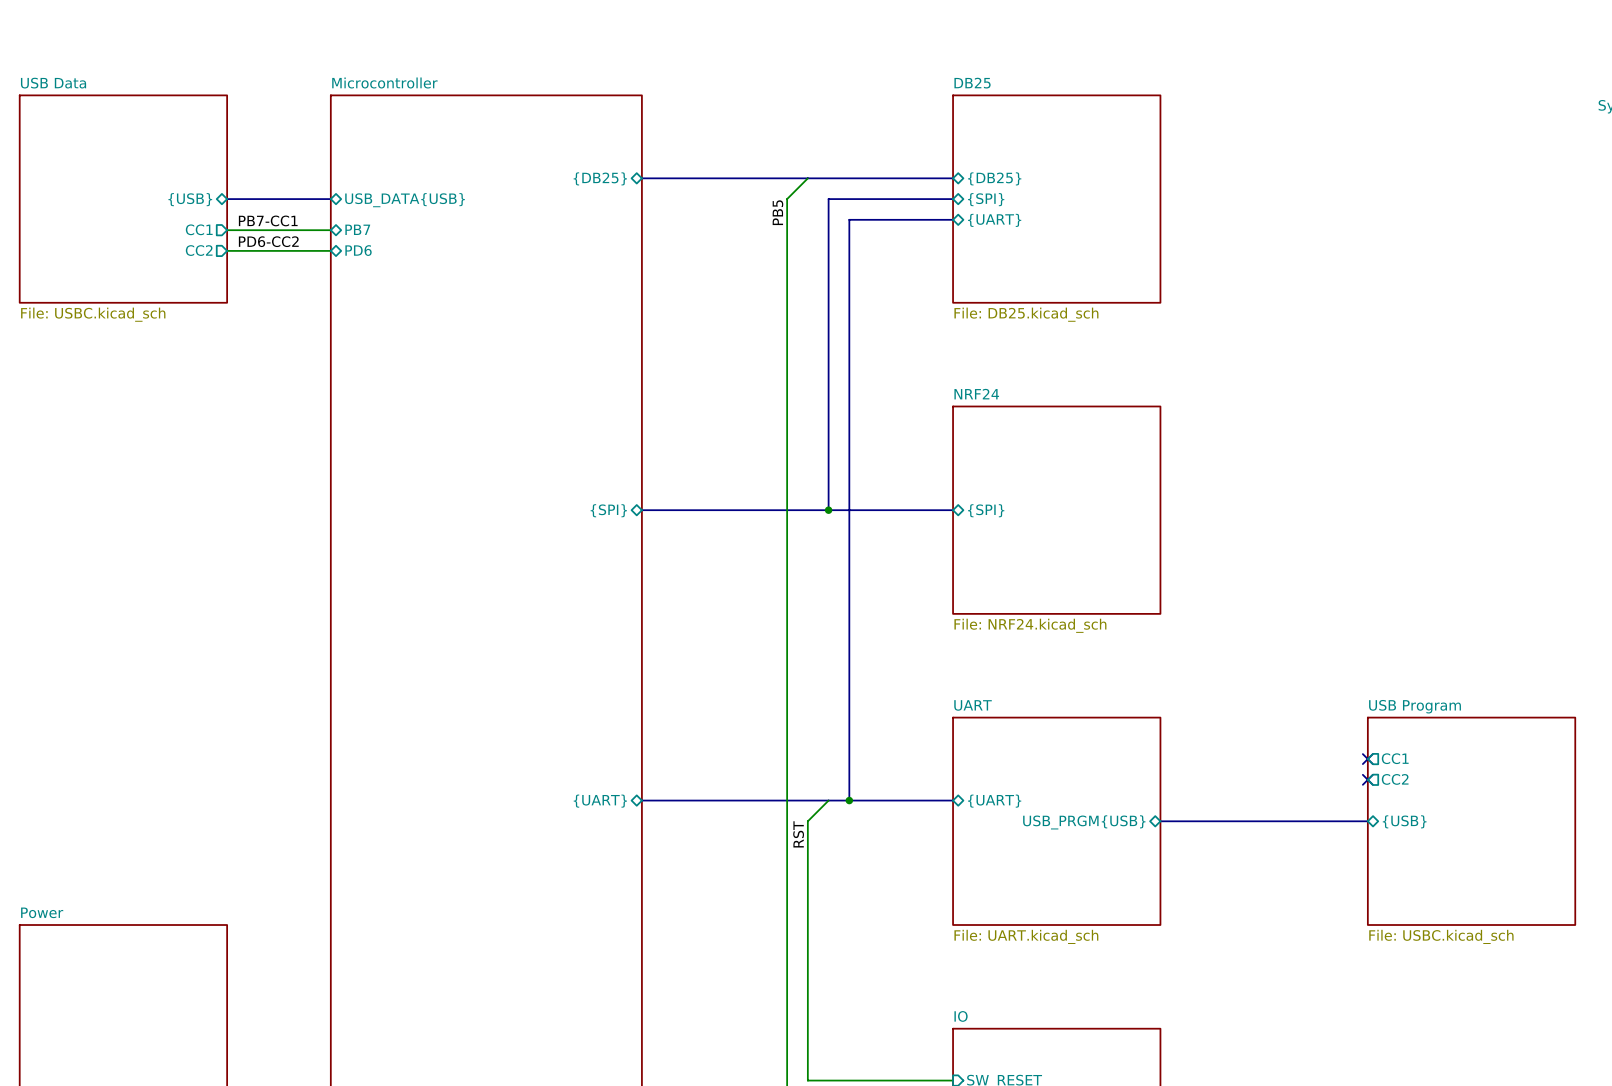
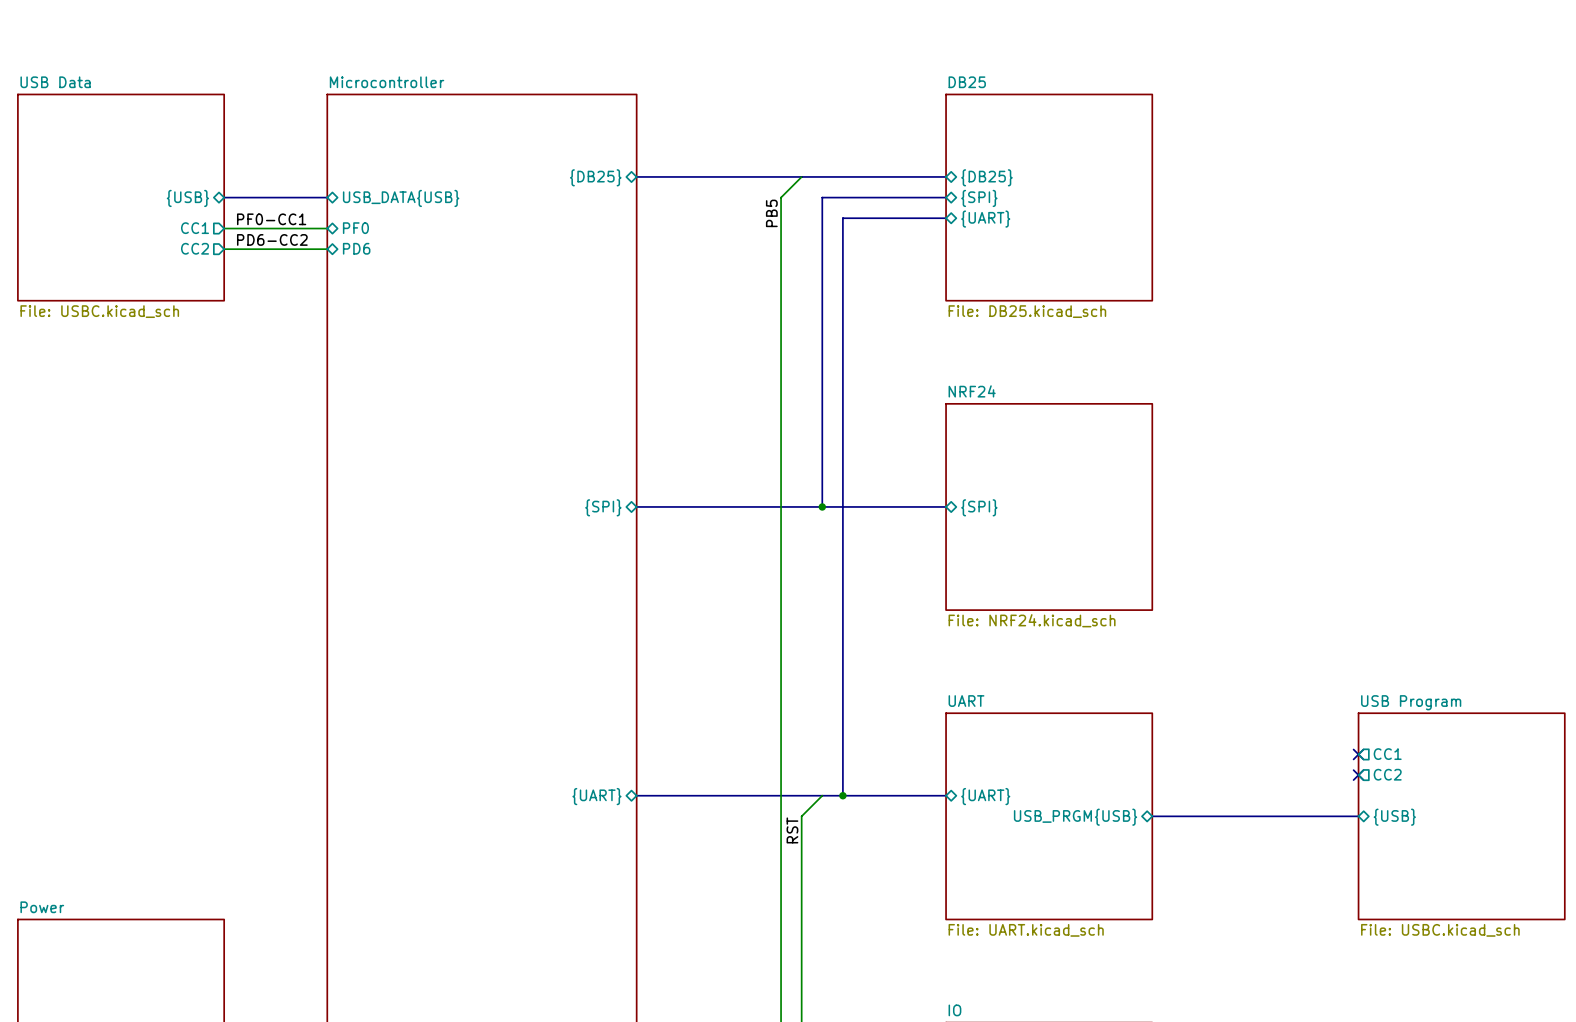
label: PB7-CC1 (268, 220) -> PF0-CC1 (271, 219)
sheet pin: PB7 (357, 229) -> PF0 (355, 228)

